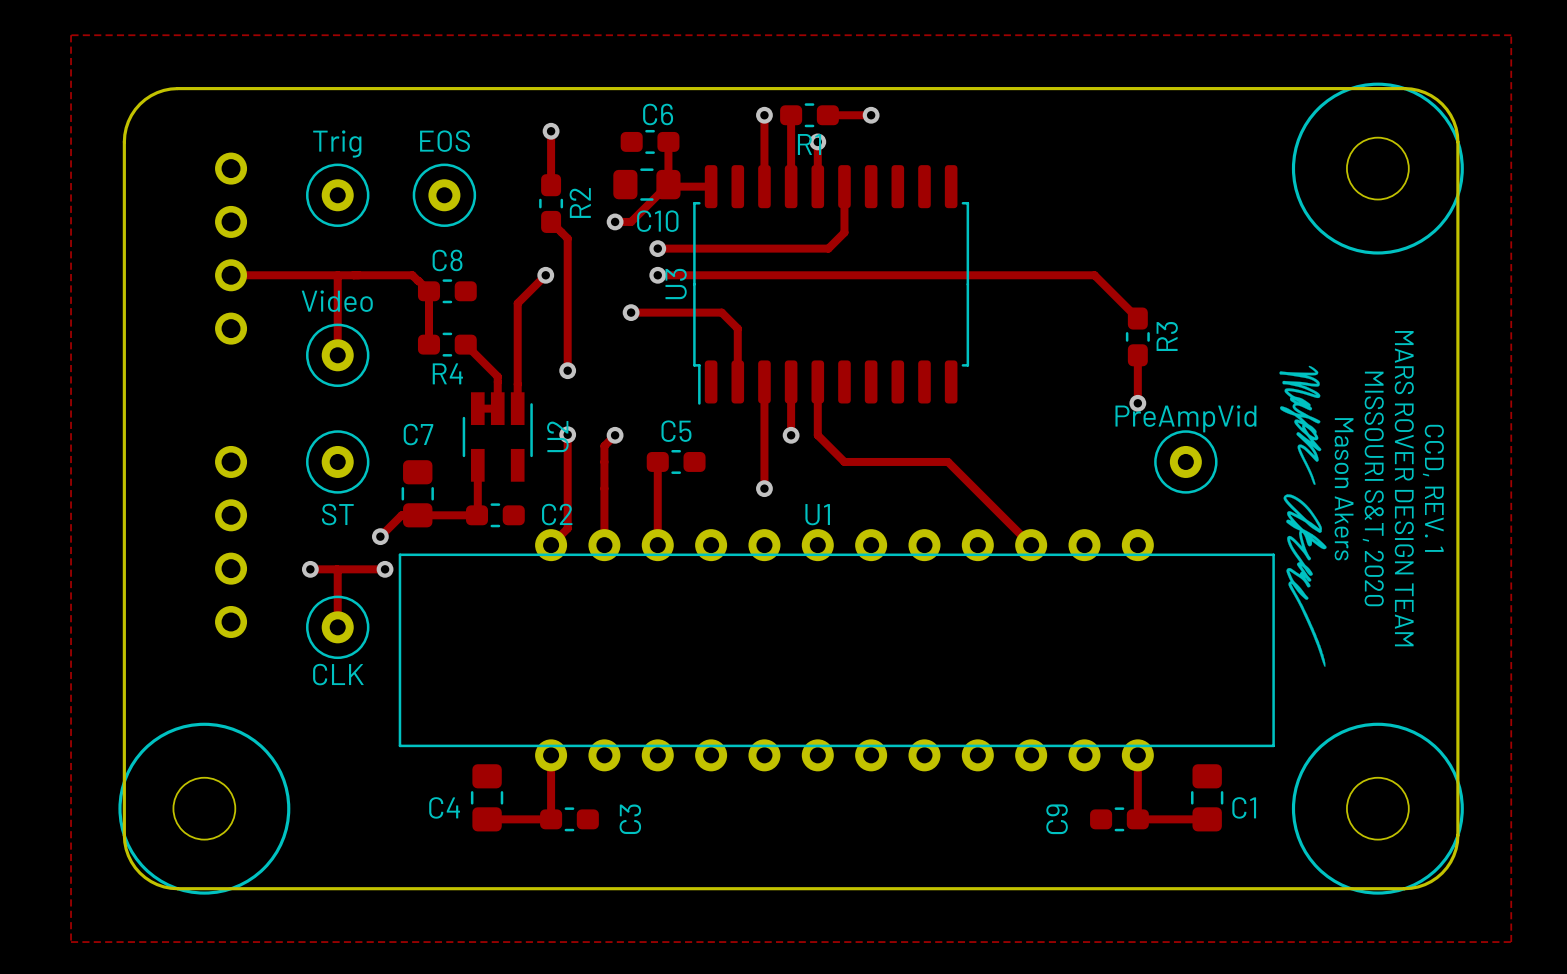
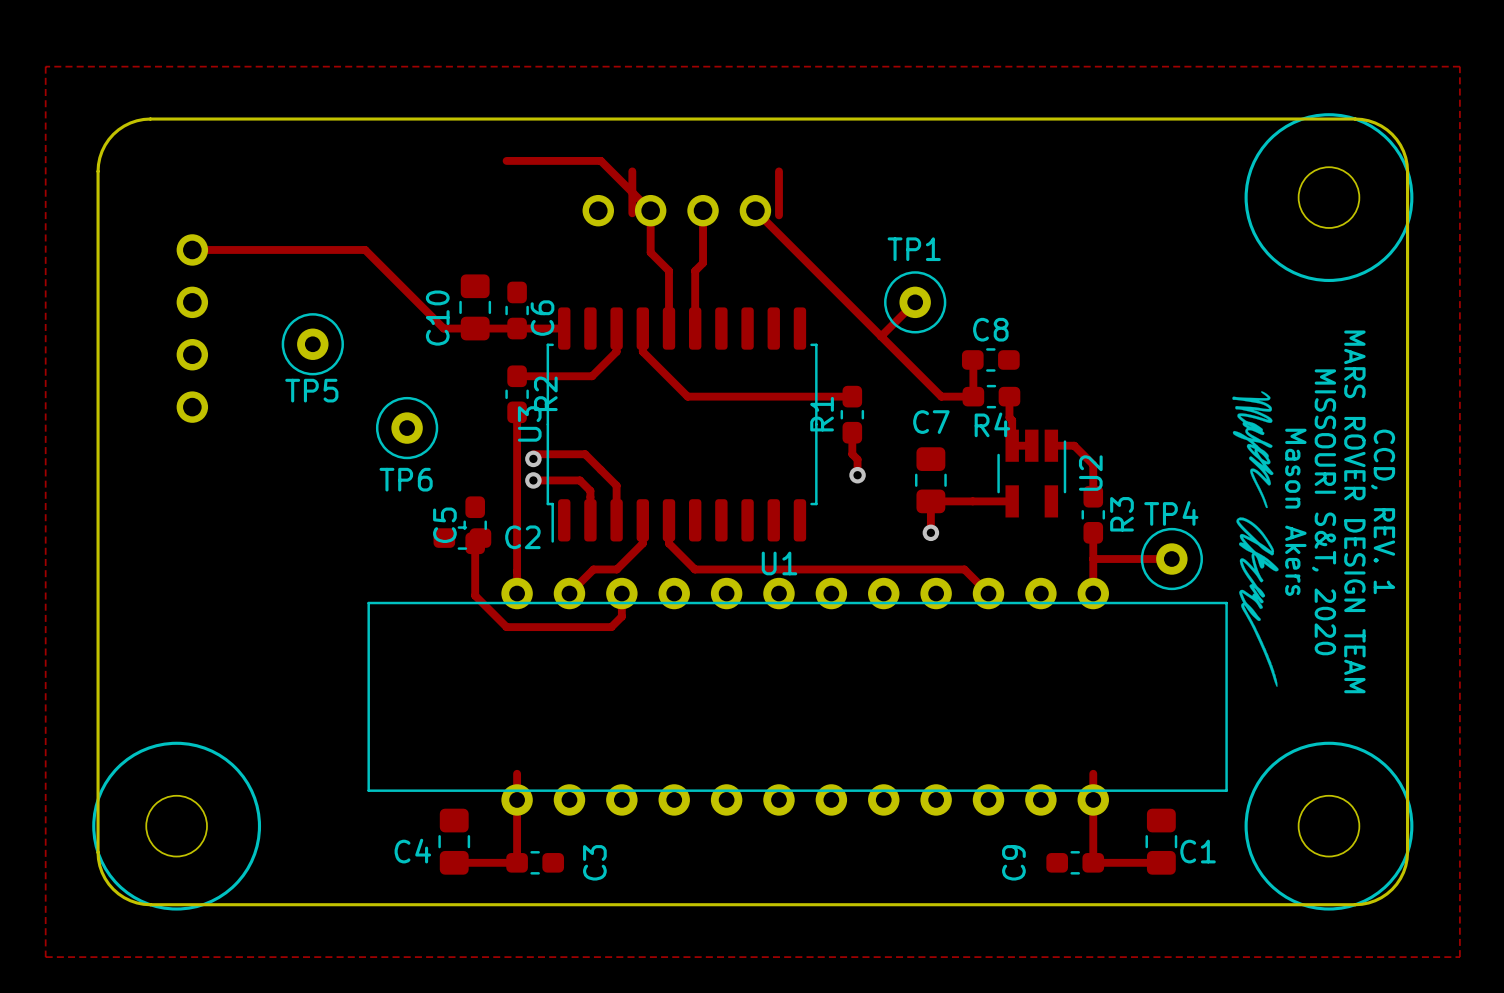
track: (764, 115) (764, 186) -> none
via: (764, 115) -> none
track: (791, 115) (791, 186) -> none
R1 rotation: 0° (809, 115) -> 90° clockwise (852, 414)
R1 position: (809, 115) -> (852, 414)
track: (827, 115) (871, 115) -> none
via: (871, 115) -> none
track: none -> (506, 160) (600, 160) (650, 210) (650, 252) (668, 270) (668, 328)
track: (551, 131) (551, 185) -> none
via: (551, 131) -> none
C6 rotation: 0° (650, 141) -> 90° clockwise (517, 310)
C6 position: (650, 141) -> (517, 310)
via: (817, 141) -> none
part: none -> (676, 210)
track: none -> (703, 210) (703, 263) (695, 270) (695, 328)
track: none -> (755, 210) (941, 396) (973, 396) (972, 359)
C10 rotation: 0° (646, 184) -> 90° clockwise (475, 307)
C10 position: (646, 184) -> (475, 307)
track: (711, 186) (670, 186) (668, 184) (631, 221) (615, 221) -> none
track: (844, 186) (844, 232) (828, 248) (657, 248) -> none
Trig: (337, 195) -> none
EOS: (444, 195) -> none
R2 position: (551, 203) -> (517, 394)
track: none -> (192, 249) (365, 249) (443, 328) (564, 328)
track: (551, 221) (567, 238) (567, 370) -> none
via: (615, 221) -> none
part position: (231, 248) -> (192, 328)
via: (657, 248) -> none
track: (231, 275) (412, 275) (428, 291) (428, 344) -> none
track: (337, 275) (337, 355) -> none
track: (545, 275) (517, 303) (517, 408) -> none
via: (545, 275) -> none
track: (657, 275) (1094, 275) (1137, 318) -> none
via: (657, 275) -> none
track: none -> (915, 302) (881, 336)
TP1: none -> (915, 302)
U3 position: (831, 284) -> (682, 425)
C8 position: (447, 291) -> (990, 359)
track: none -> (616, 328) (616, 351) (592, 376) (517, 376)
track: none -> (642, 328) (642, 351) (687, 396) (852, 396)
track: (631, 312) (721, 312) (737, 328) (737, 381) -> none
via: (631, 312) -> none
TP5: none -> (312, 344)
R3 position: (1137, 336) -> (1093, 514)
R4 position: (447, 344) -> (991, 396)
track: (465, 344) (497, 376) (497, 408) (477, 408) -> none
Video: (337, 355) -> none
track: (1137, 355) (1137, 403) -> none
via: (567, 370) -> none
track: none -> (1009, 396) (1012, 445) (1031, 445)
track: (764, 381) (764, 488) -> none
track: (791, 381) (791, 435) -> none
track: (817, 381) (817, 435) (844, 461) (947, 461) (1031, 545) -> none
track: none -> (517, 412) (517, 593)
TP6: none -> (407, 428)
via: (1137, 403) -> none
track: none -> (852, 432) (852, 454) (857, 459) (857, 475)
track: none -> (1051, 445) (1074, 445) (1093, 464) (1093, 496)
track: none -> (533, 454) (585, 454) (616, 485) (616, 520)
C5 name position: C5 (676, 431) -> C5 (444, 525)
track: (567, 434) (567, 528) (551, 545) -> none
track: (615, 435) (604, 445) (604, 545) -> none
via: (615, 435) -> none
via: (791, 435) -> none
U2 position: (497, 436) -> (1031, 473)
via: none -> (857, 475)
track: none -> (533, 480) (579, 480) (590, 490) (590, 520)
via: none -> (533, 480)
ST: (337, 461) -> none
track: (657, 461) (657, 545) -> none
C5 rotation: 0° (676, 461) -> 90° clockwise (475, 525)
C5 position: (676, 461) -> (475, 525)
PreAmpVid: (1185, 461) -> none
track: (477, 465) (477, 515) (401, 515) (380, 536) -> none
track: none -> (1012, 501) (930, 501) (930, 532)
via: (764, 488) -> none
C7 position: (417, 493) -> (930, 480)
track: none -> (642, 520) (642, 543) (616, 569) (593, 569) (569, 593)
track: none -> (668, 520) (668, 543) (694, 569) (964, 569) (988, 593)
via: none -> (930, 532)
track: none -> (1093, 532) (1093, 593)
track: none -> (475, 543) (475, 595) (506, 627) (611, 627) (621, 616) (621, 593)
via: (380, 536) -> none
track: none -> (1093, 559) (1171, 559)
TP4: none -> (1171, 559)
part: (231, 541) -> none
track: (310, 569) (385, 569) -> none
via: (310, 569) -> none
track: (337, 569) (337, 627) -> none
via: (385, 569) -> none
CLK: (337, 627) -> none
U1 position: (836, 650) -> (797, 696)
C4 position: (487, 797) -> (454, 841)
C1 position: (1207, 797) -> (1161, 841)
track: (487, 819) (551, 819) -> (454, 862) (517, 862) (517, 836)
C3 position: (569, 819) -> (535, 862)
C9 position: (1119, 819) -> (1075, 862)
track: (1137, 819) (1207, 819) -> (1093, 836) (1093, 862) (1161, 862)

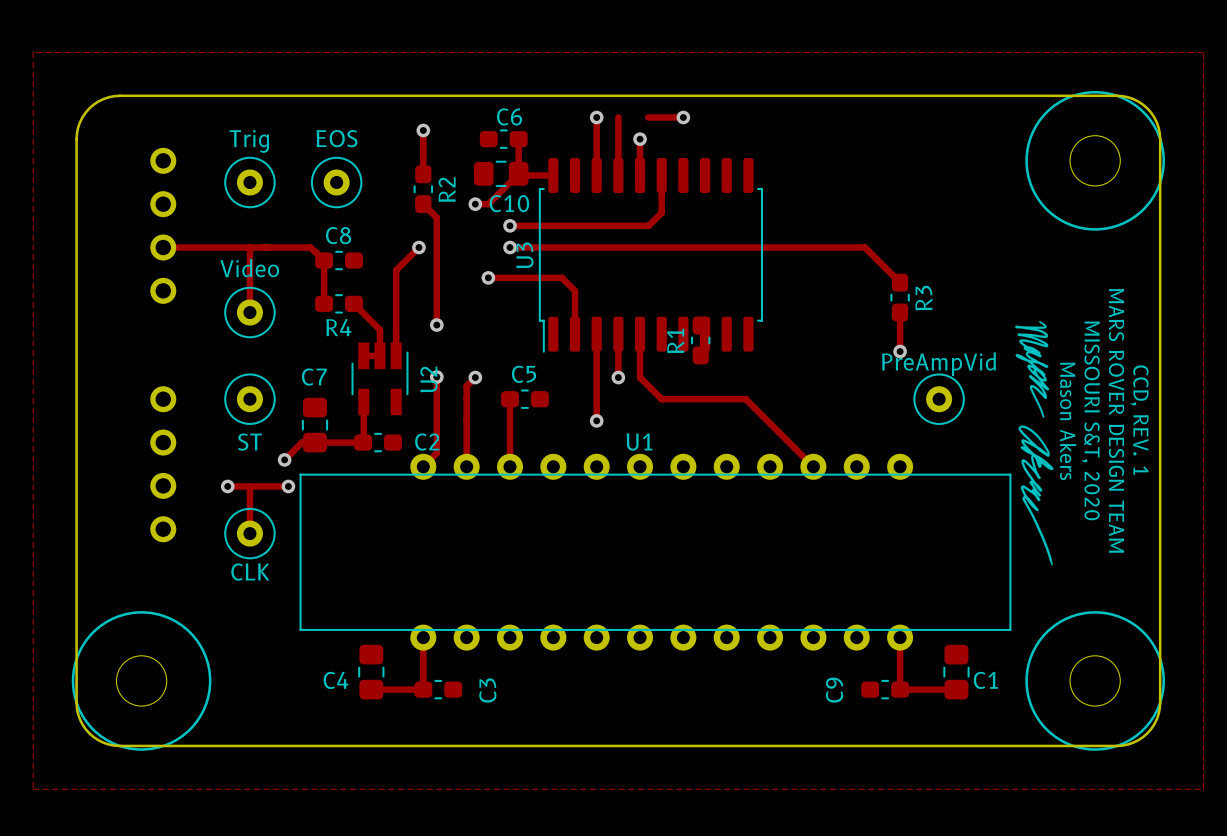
track: none -> (596, 117) (596, 175)
via: none -> (596, 117)
track: none -> (618, 117) (618, 175)
track: none -> (648, 117) (683, 117)
via: none -> (683, 117)
track: (506, 160) (600, 160) (650, 210) (650, 252) (668, 270) (668, 328) -> none
track: none -> (423, 130) (423, 174)
via: none -> (423, 130)
via: none -> (640, 139)
part: (676, 210) -> none
track: (703, 210) (703, 263) (695, 270) (695, 328) -> none
track: (755, 210) (941, 396) (973, 396) (972, 359) -> none
track: none -> (553, 175) (520, 175) (518, 173) (488, 204) (475, 204)
track: none -> (661, 175) (661, 212) (648, 225) (510, 225)
Trig: none -> (249, 182)
EOS: none -> (336, 182)
track: (192, 249) (365, 249) (443, 328) (564, 328) -> none
track: none -> (423, 204) (436, 217) (436, 325)
via: none -> (475, 204)
via: none -> (510, 225)
track: none -> (163, 247) (310, 247) (324, 260) (324, 303)
track: none -> (249, 247) (249, 312)
track: none -> (418, 247) (396, 270) (396, 355)
via: none -> (418, 247)
track: none -> (510, 247) (864, 247) (900, 282)
via: none -> (510, 247)
track: (915, 302) (881, 336) -> none
TP1: (915, 302) -> none
C10 rotation: 0° (475, 307) -> 90° clockwise (501, 173)
C10 position: (475, 307) -> (501, 173)
C6 rotation: 0° (517, 310) -> 90° clockwise (503, 139)
C6 position: (517, 310) -> (503, 139)
C10 name position: C10 (437, 318) -> C10 (509, 203)
part position: (192, 328) -> (163, 225)
track: (616, 328) (616, 351) (592, 376) (517, 376) -> none
track: (642, 328) (642, 351) (687, 396) (852, 396) -> none
track: none -> (488, 277) (562, 277) (575, 290) (575, 334)
via: none -> (488, 277)
TP5: (312, 344) -> none
C8 position: (990, 359) -> (339, 260)
track: none -> (353, 303) (379, 329) (379, 355) (363, 355)
Video: none -> (249, 312)
track: none -> (900, 312) (900, 351)
R2 position: (517, 394) -> (423, 189)
via: none -> (436, 325)
R4 position: (991, 396) -> (339, 303)
track: (1009, 396) (1012, 445) (1031, 445) -> none
track: none -> (596, 334) (596, 420)
track: none -> (618, 334) (618, 377)
track: none -> (640, 334) (640, 377) (661, 399) (745, 399) (813, 466)
track: (517, 412) (517, 593) -> none
U3 position: (682, 425) -> (650, 255)
TP6: (407, 428) -> none
via: none -> (900, 351)
track: (852, 432) (852, 454) (857, 459) (857, 475) -> none
track: (1051, 445) (1074, 445) (1093, 464) (1093, 496) -> none
track: (533, 454) (585, 454) (616, 485) (616, 520) -> none
track: none -> (436, 377) (436, 453) (423, 466)
track: none -> (475, 377) (466, 386) (466, 466)
via: none -> (475, 377)
via: none -> (618, 377)
U2 position: (1031, 473) -> (379, 378)
via: (857, 475) -> none
track: (533, 480) (579, 480) (590, 490) (590, 520) -> none
via: (533, 480) -> none
C7 position: (930, 480) -> (314, 425)
ST: none -> (249, 399)
track: none -> (510, 399) (510, 466)
PreAmpVid: none -> (939, 399)
track: none -> (363, 401) (363, 442) (301, 442) (284, 459)
track: (1012, 501) (930, 501) (930, 532) -> none
via: none -> (596, 420)
R3 position: (1093, 514) -> (900, 297)
track: (642, 520) (642, 543) (616, 569) (593, 569) (569, 593) -> none
track: (668, 520) (668, 543) (694, 569) (964, 569) (988, 593) -> none
C5 rotation: 0° (475, 525) -> 90° clockwise (524, 399)
C5 position: (475, 525) -> (524, 399)
via: (930, 532) -> none
track: (1093, 532) (1093, 593) -> none
track: (475, 543) (475, 595) (506, 627) (611, 627) (621, 616) (621, 593) -> none
via: none -> (284, 459)
track: (1093, 559) (1171, 559) -> none
TP4: (1171, 559) -> none
part: none -> (163, 464)
track: none -> (227, 486) (288, 486)
via: none -> (227, 486)
track: none -> (249, 486) (249, 533)
via: none -> (288, 486)
CLK: none -> (249, 533)
U1 position: (797, 696) -> (655, 552)
track: (517, 836) (517, 862) (454, 862) -> (423, 689) (371, 689)
track: (1093, 836) (1093, 862) (1161, 862) -> (900, 689) (956, 689)
C4 position: (454, 841) -> (371, 672)
C1 position: (1161, 841) -> (956, 672)
C3 position: (535, 862) -> (438, 689)
C9 position: (1075, 862) -> (885, 689)

